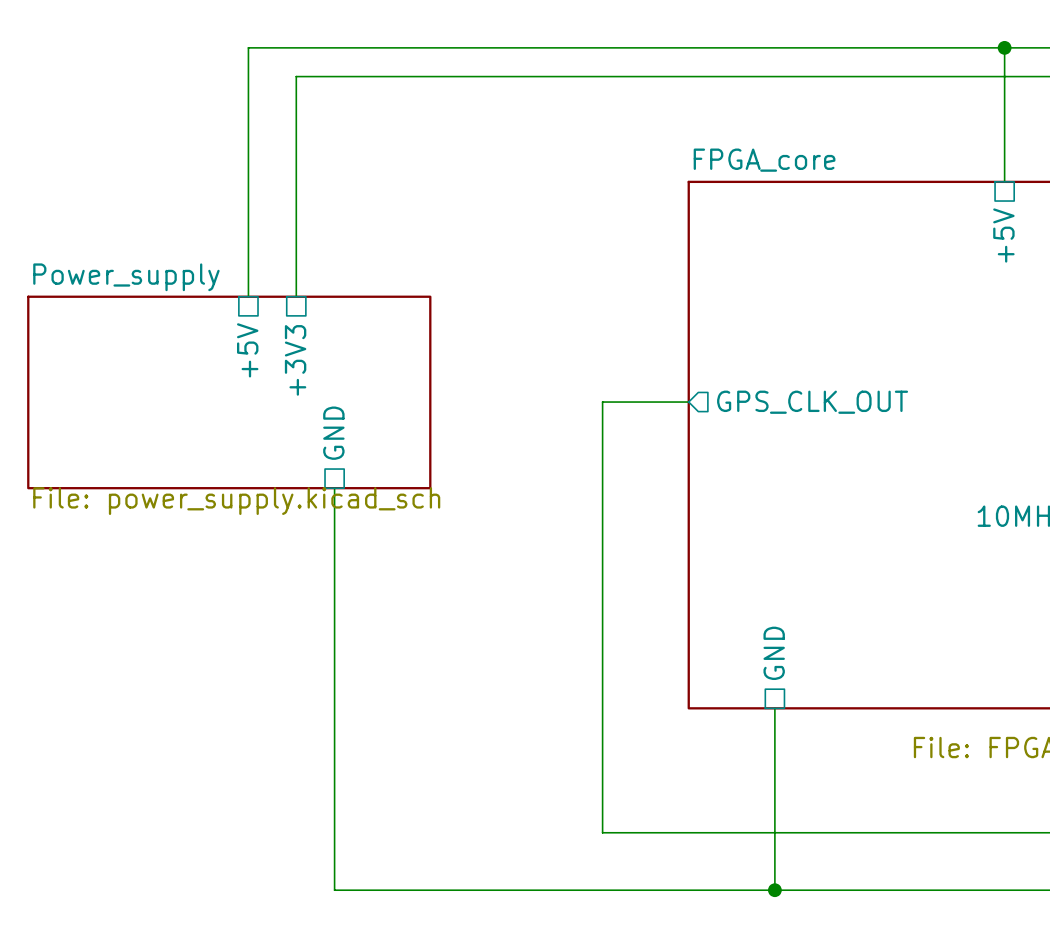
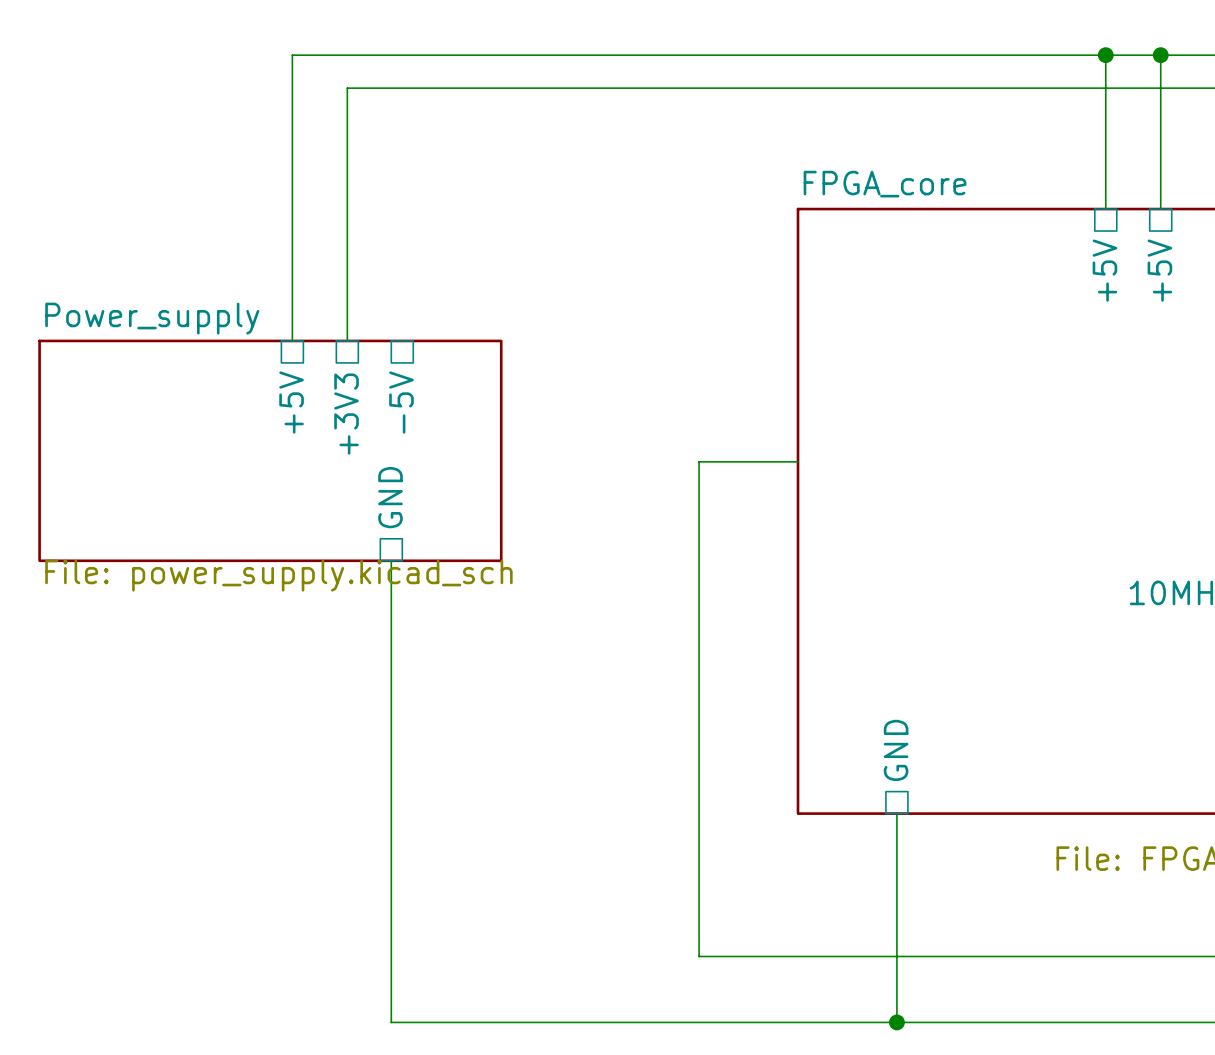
wire: none -> (1105, 55) (1105, 209)
junction: none -> (1105, 55)
sheet pin: none -> +5V (1104, 270)
sheet pin: none -> -5V (401, 402)
sheet pin: GPS_CLK_OUT (812, 402) -> none

